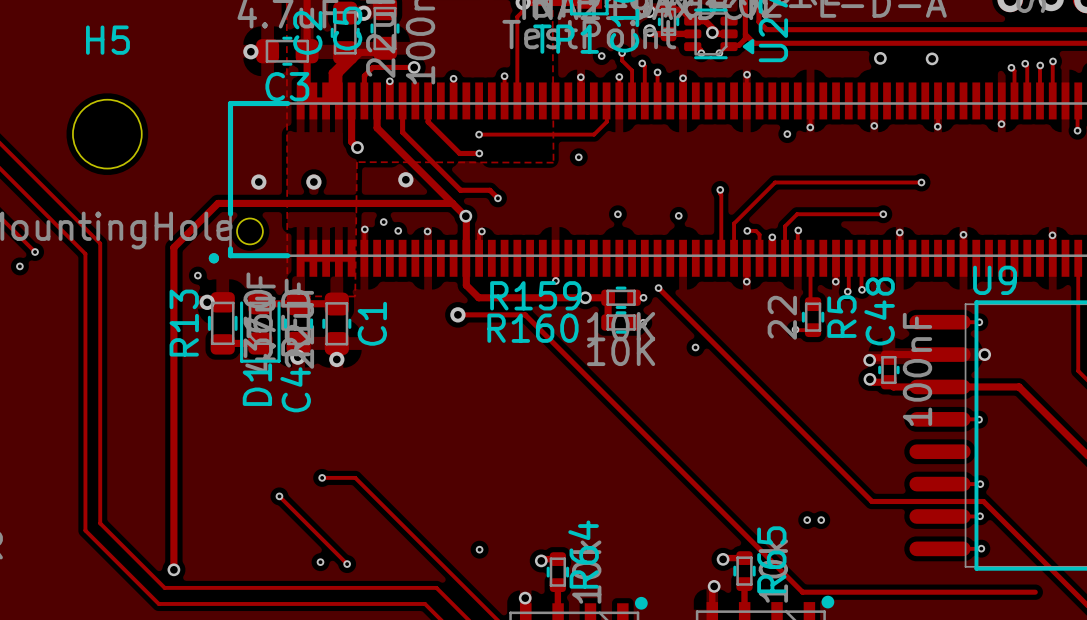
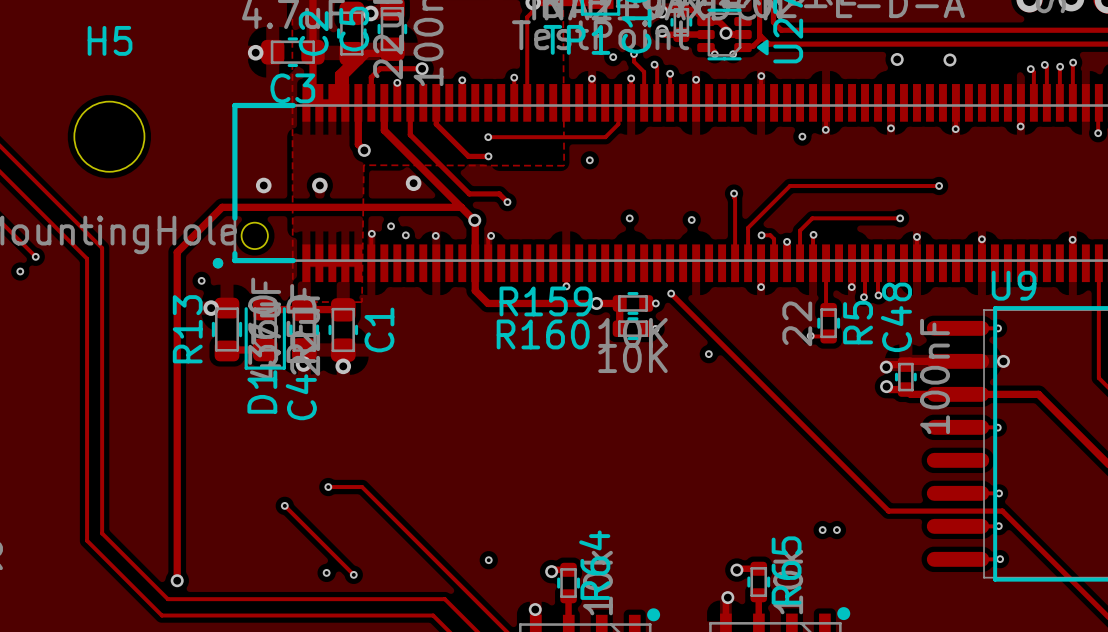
track: (457, 314) (525, 314) (802, 592) (1035, 592) -> none
via: (457, 314) -> none

